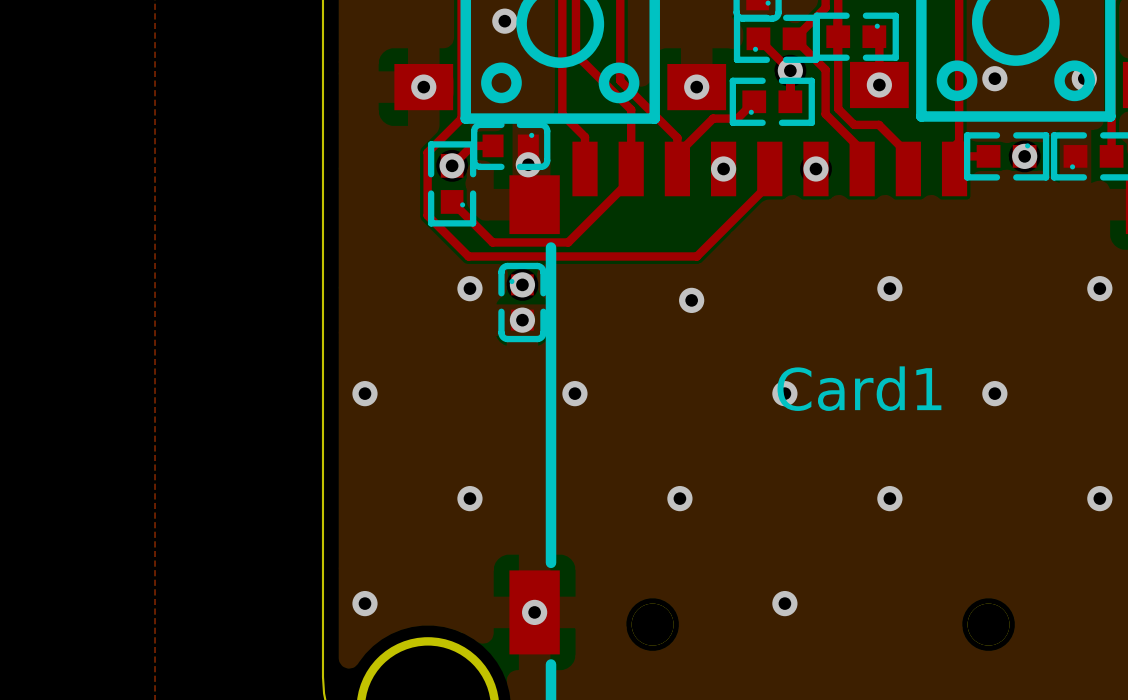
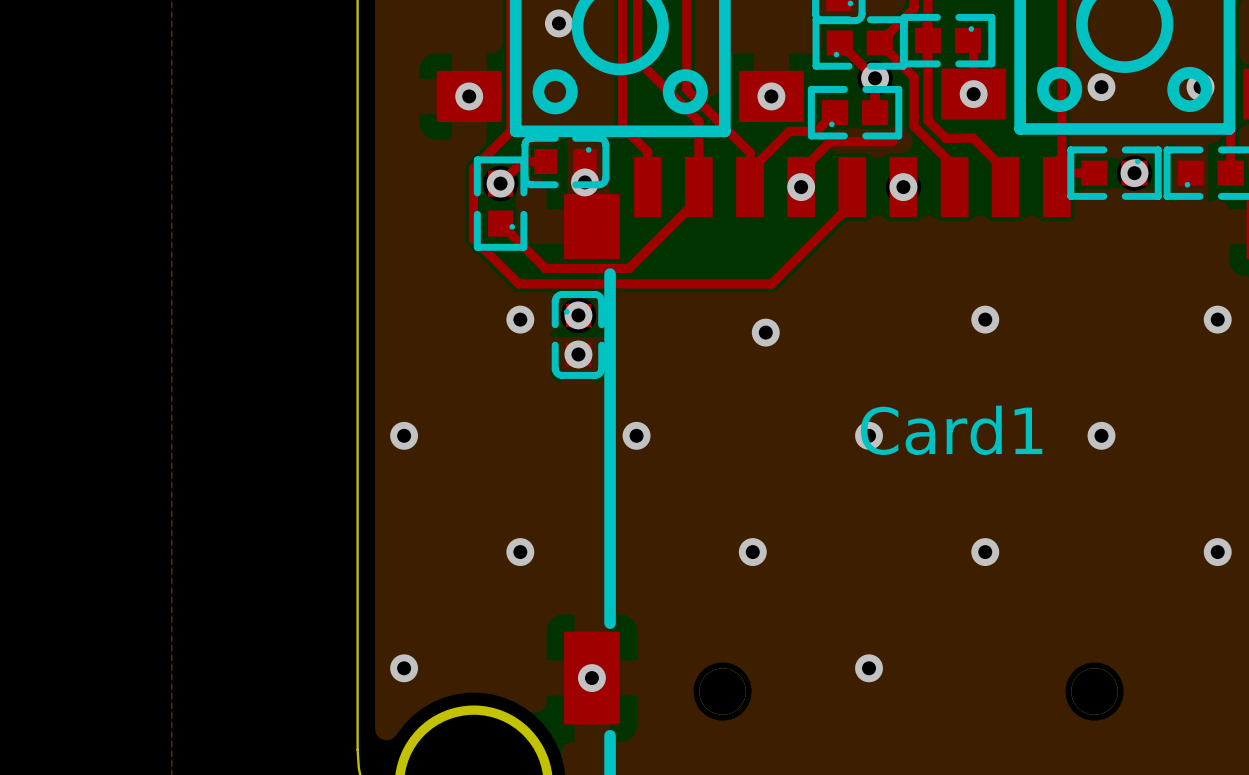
top track: none -> (892, 141) (830, 141) (801, 170)

